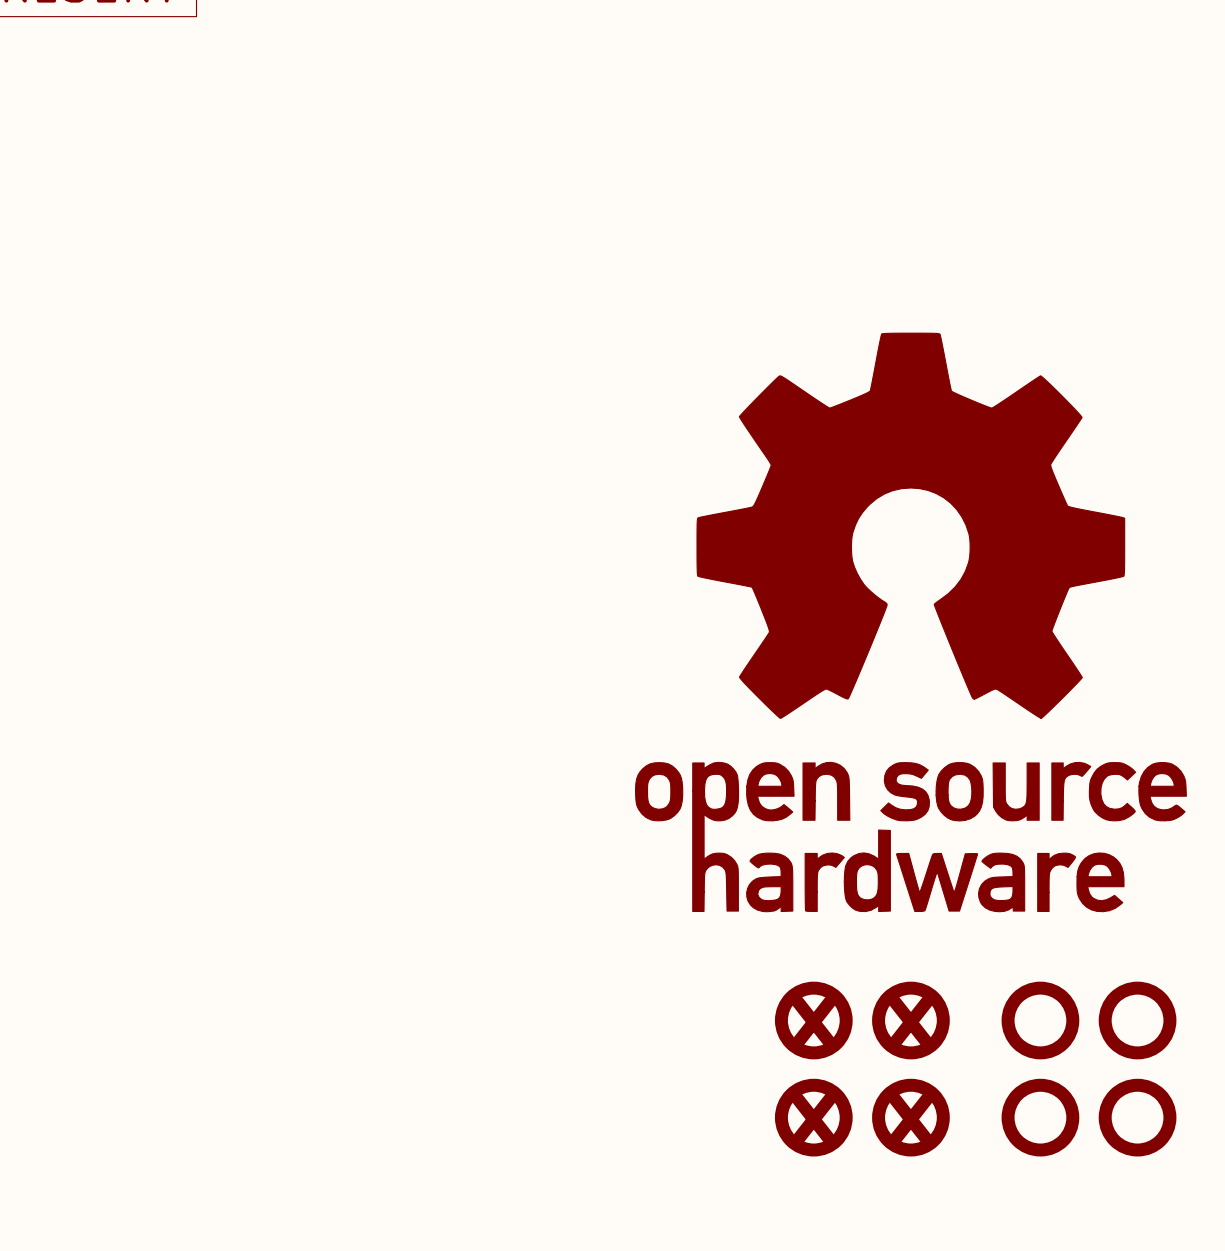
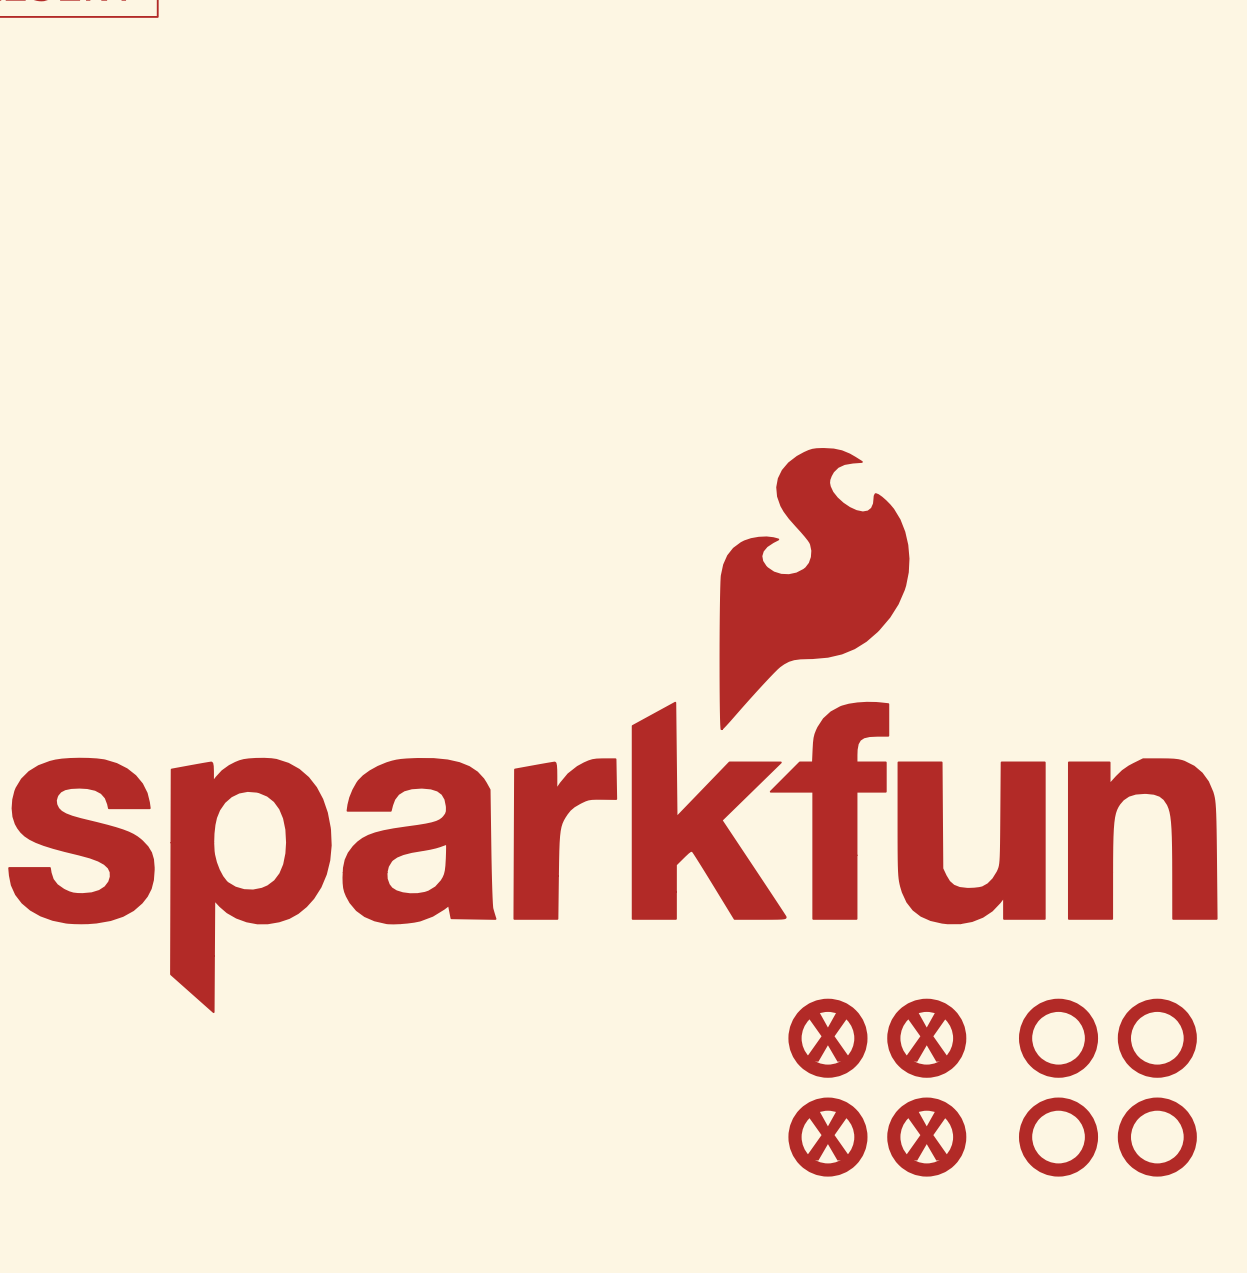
part: (910, 622) -> none
part: none -> (612, 730)

